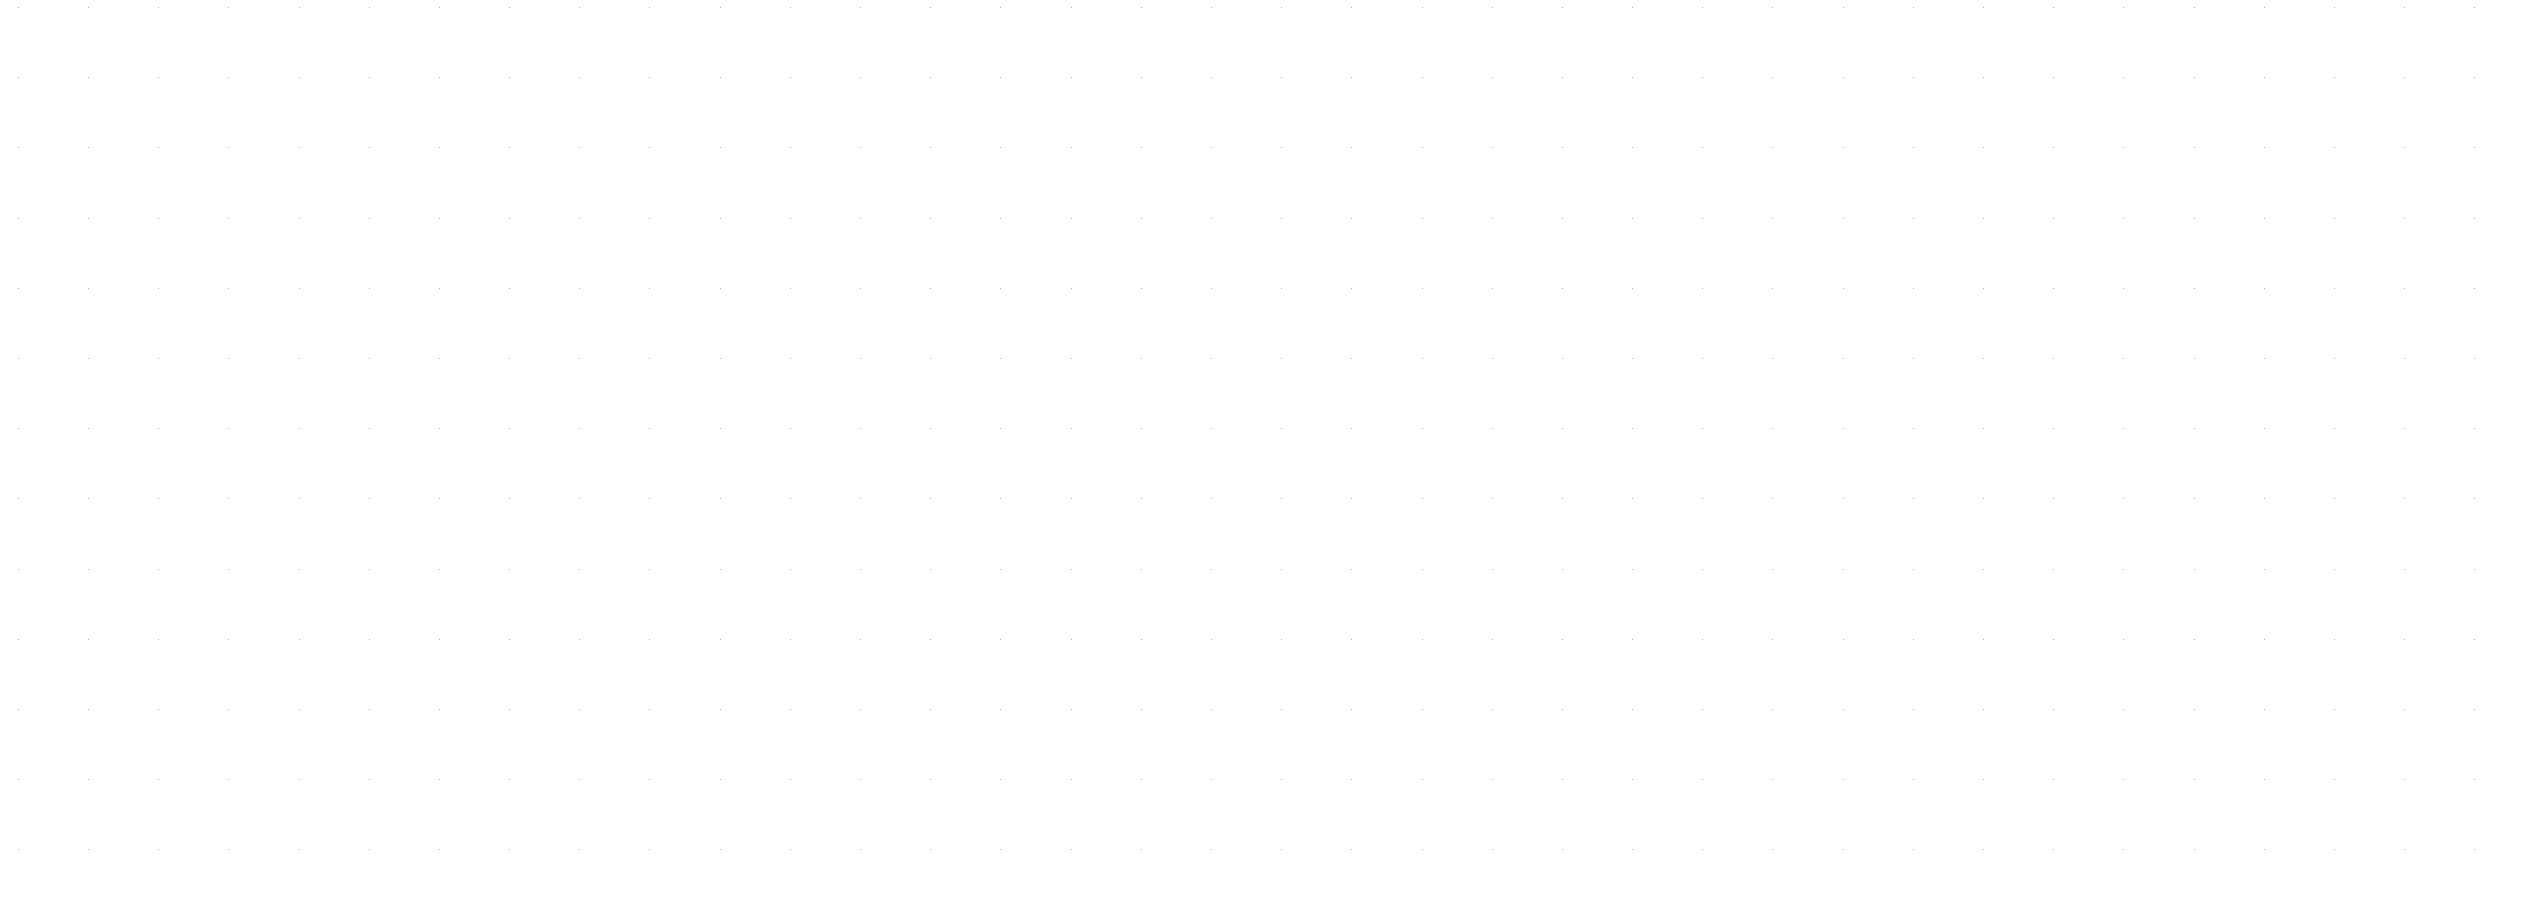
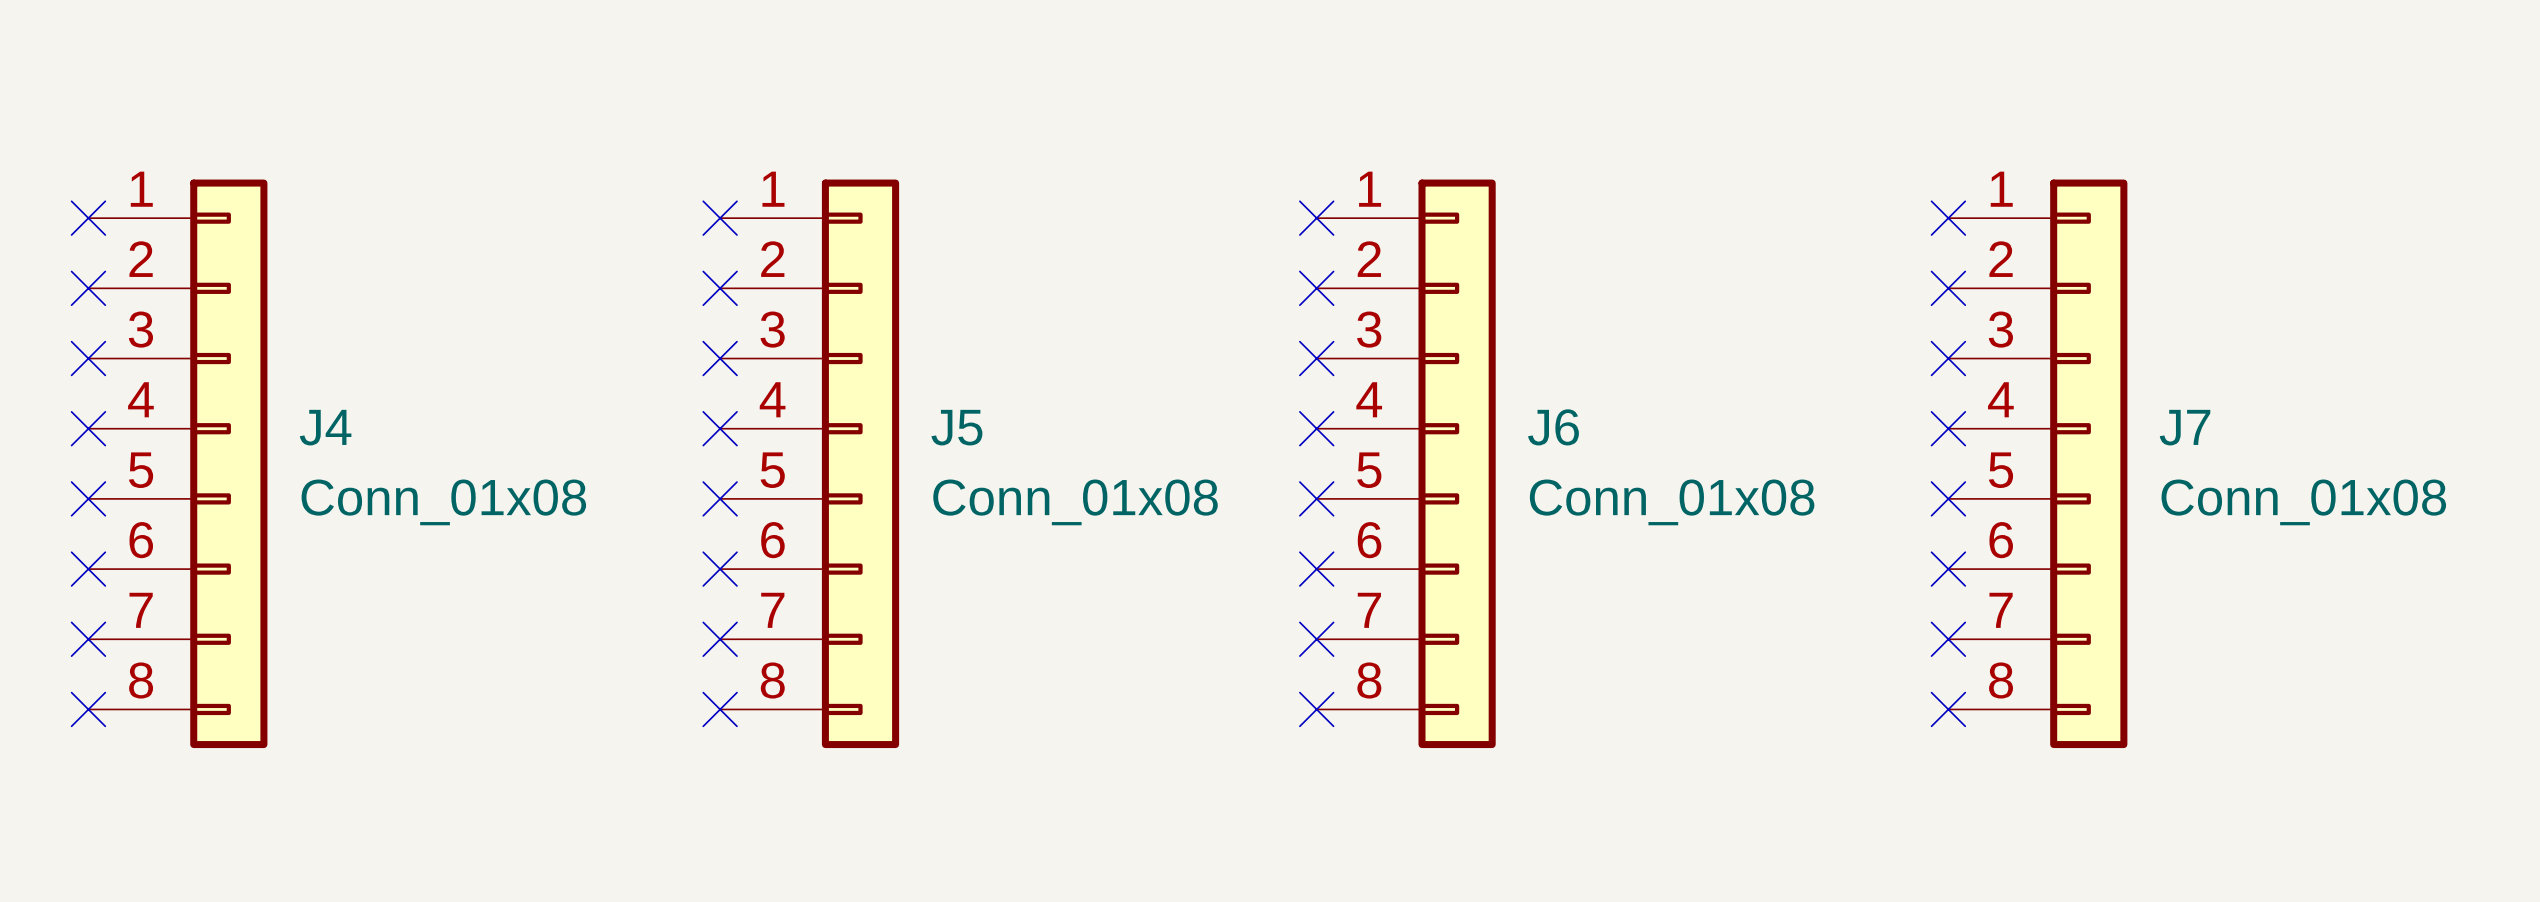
no-connect mark: none -> (88, 218)
no-connect mark: none -> (720, 218)
no-connect mark: none -> (1316, 218)
no-connect mark: none -> (1948, 218)
no-connect mark: none -> (88, 288)
no-connect mark: none -> (720, 288)
no-connect mark: none -> (1316, 288)
no-connect mark: none -> (1948, 288)
no-connect mark: none -> (88, 358)
no-connect mark: none -> (720, 358)
no-connect mark: none -> (1316, 358)
no-connect mark: none -> (1948, 358)
no-connect mark: none -> (88, 428)
no-connect mark: none -> (720, 428)
no-connect mark: none -> (1316, 428)
no-connect mark: none -> (1948, 428)
J4: none -> Conn_01x08 (177, 463)
J5: none -> Conn_01x08 (809, 463)
J6: none -> Conn_01x08 (1406, 463)
J7: none -> Conn_01x08 (2037, 463)
no-connect mark: none -> (88, 498)
no-connect mark: none -> (720, 498)
no-connect mark: none -> (1316, 498)
no-connect mark: none -> (1948, 498)
no-connect mark: none -> (88, 569)
no-connect mark: none -> (720, 569)
no-connect mark: none -> (1316, 569)
no-connect mark: none -> (1948, 569)
no-connect mark: none -> (88, 639)
no-connect mark: none -> (720, 639)
no-connect mark: none -> (1316, 639)
no-connect mark: none -> (1948, 639)
no-connect mark: none -> (88, 709)
no-connect mark: none -> (720, 709)
no-connect mark: none -> (1316, 709)
no-connect mark: none -> (1948, 709)

